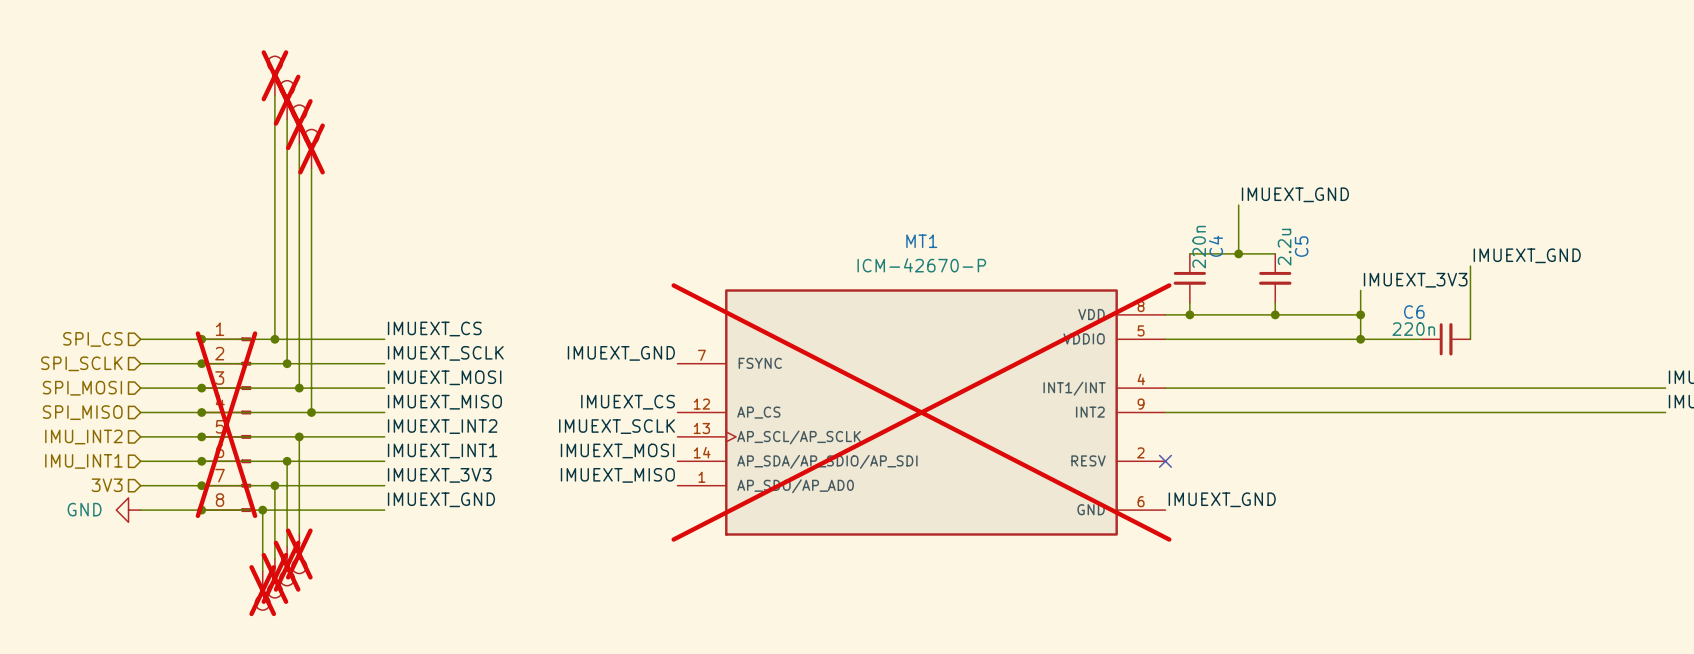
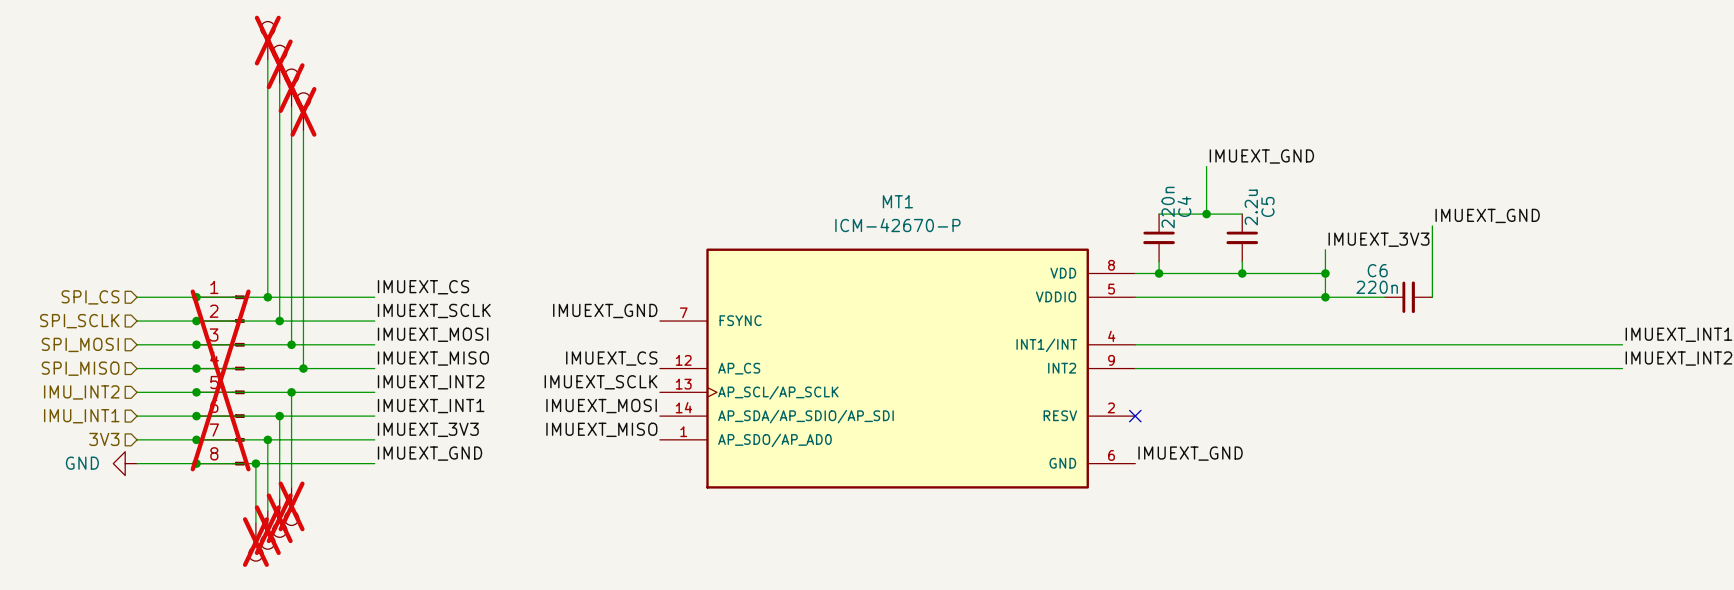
MT1 do-not-place cross: (921, 412) -> none

